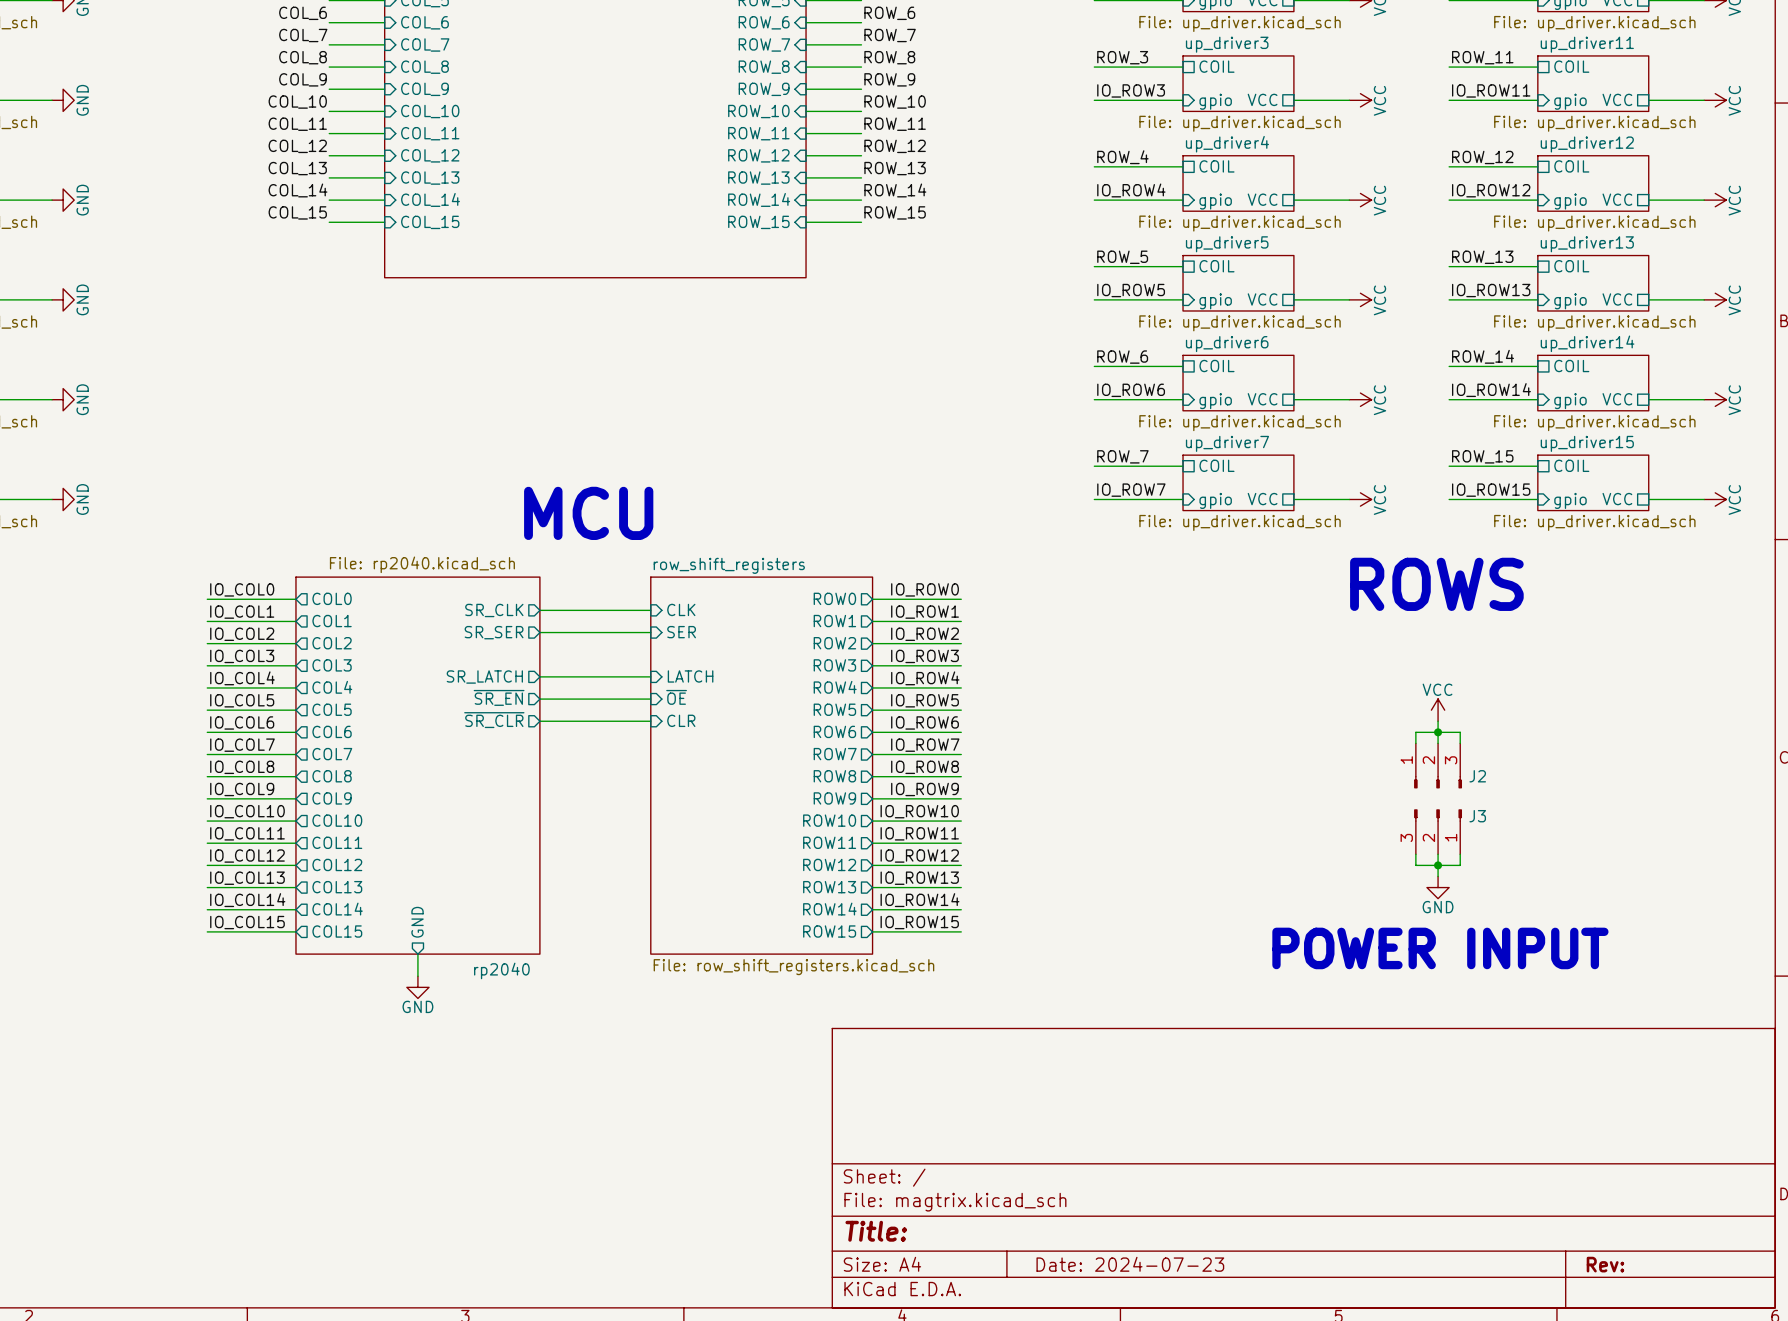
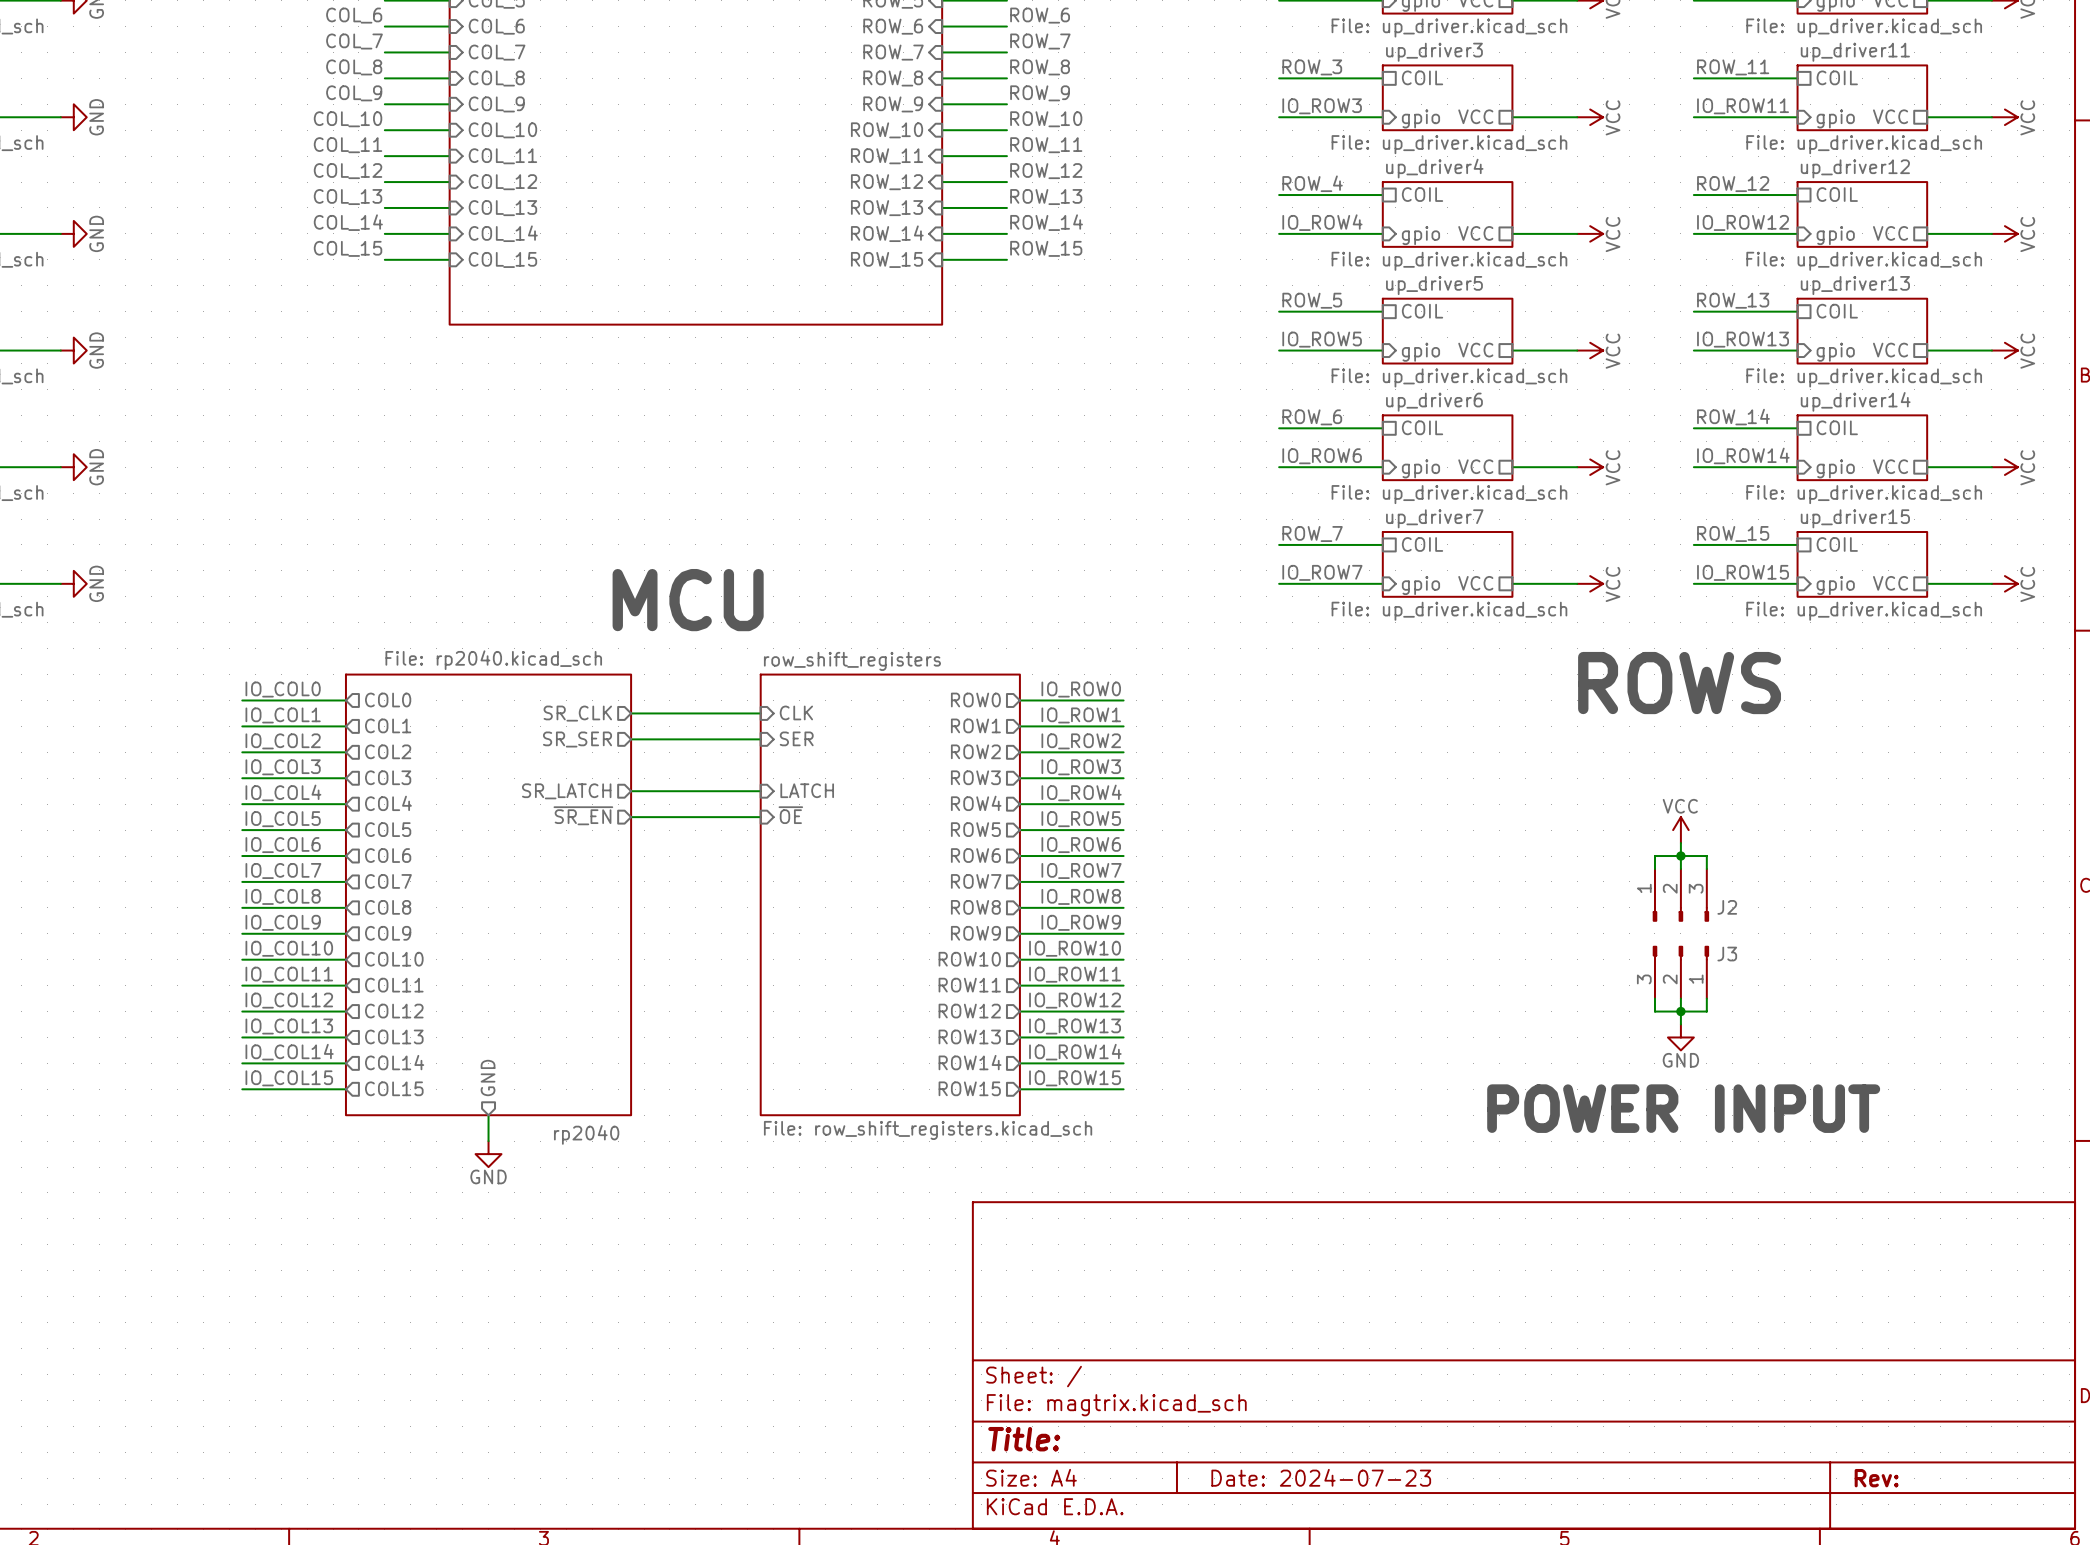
sheet pin: ~{SR_CLR} (494, 720) -> none
sheet pin: CLR (681, 720) -> none
wire: (539, 721) (650, 721) -> none

